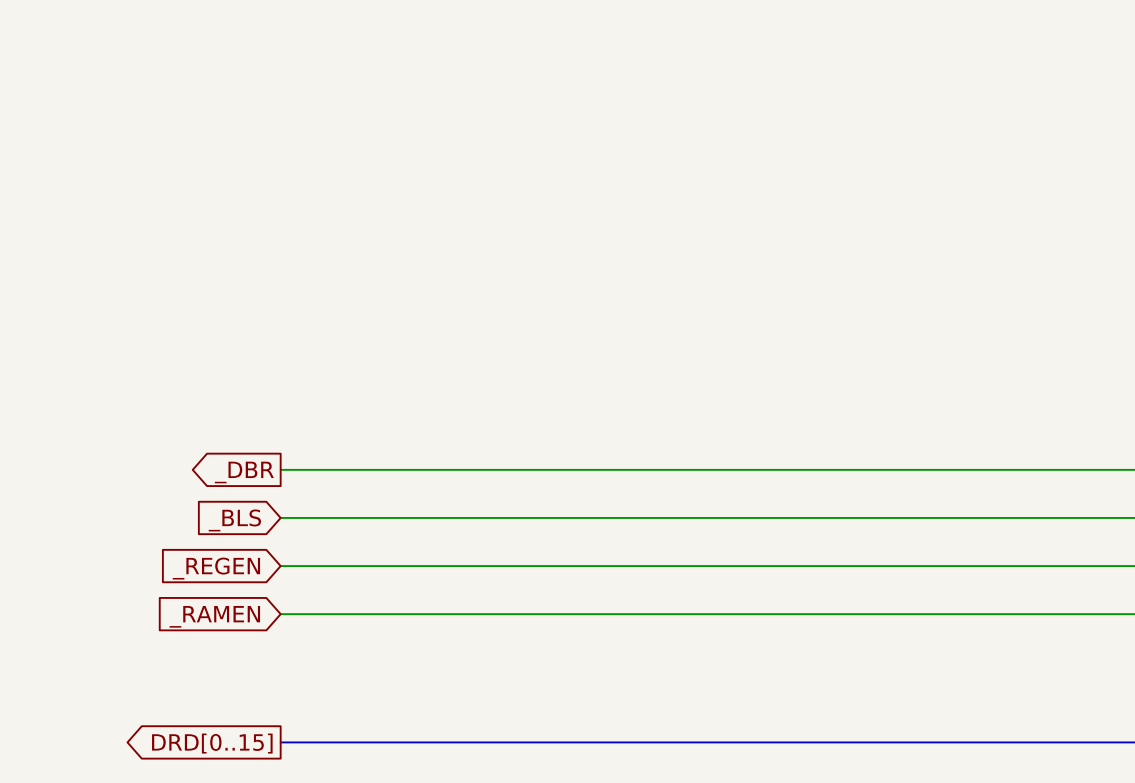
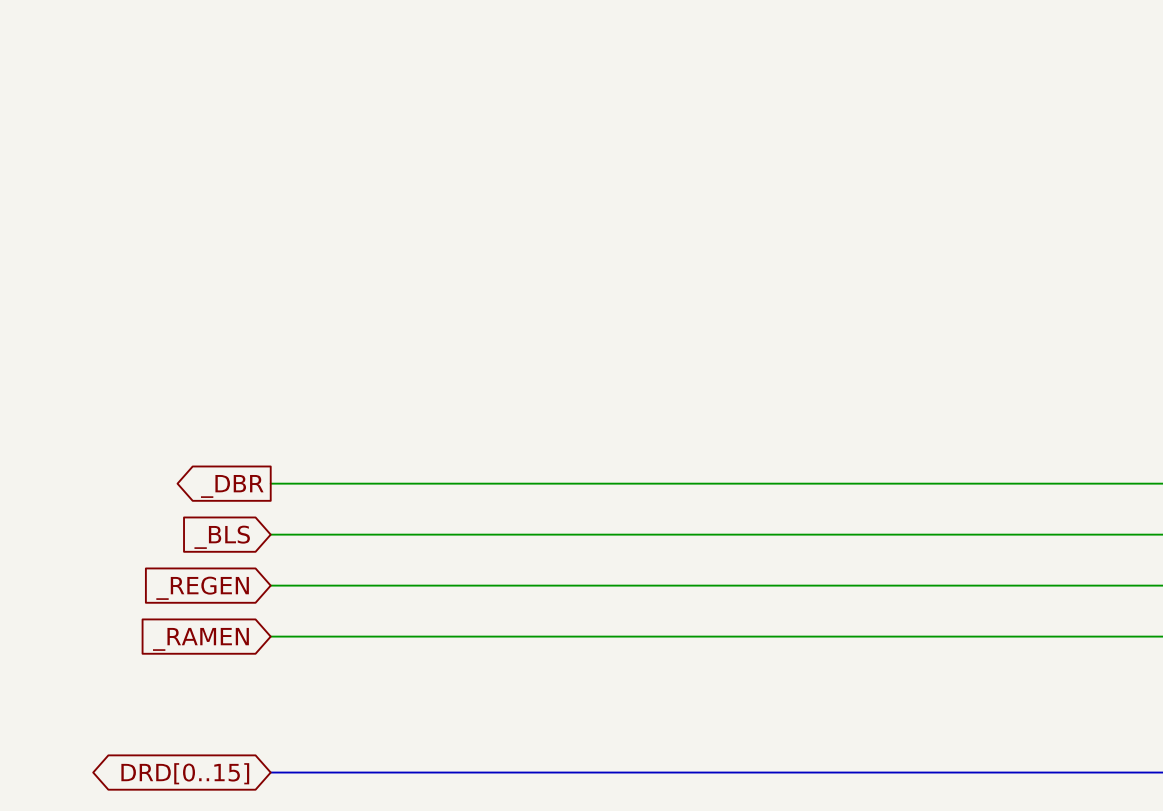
global label shape: output (212, 743) -> bidirectional (185, 773)

